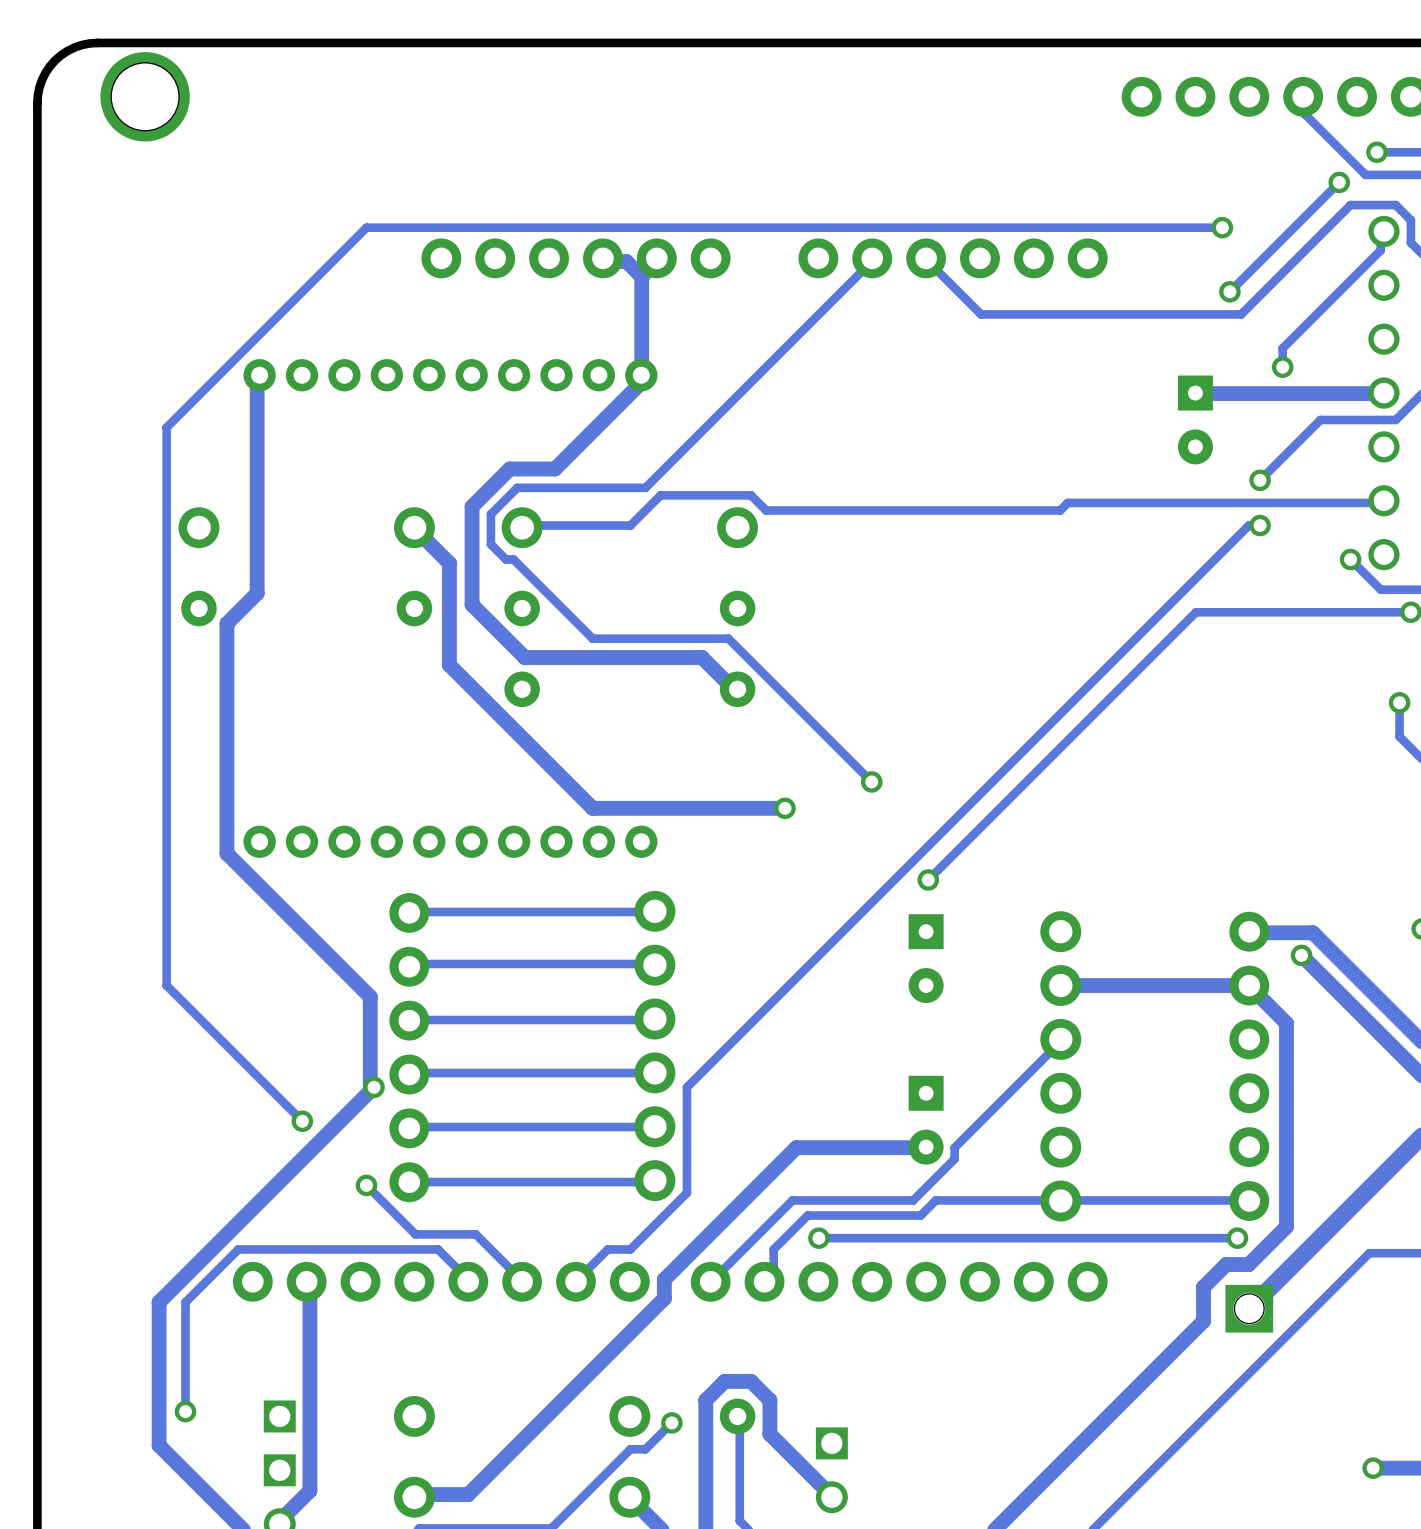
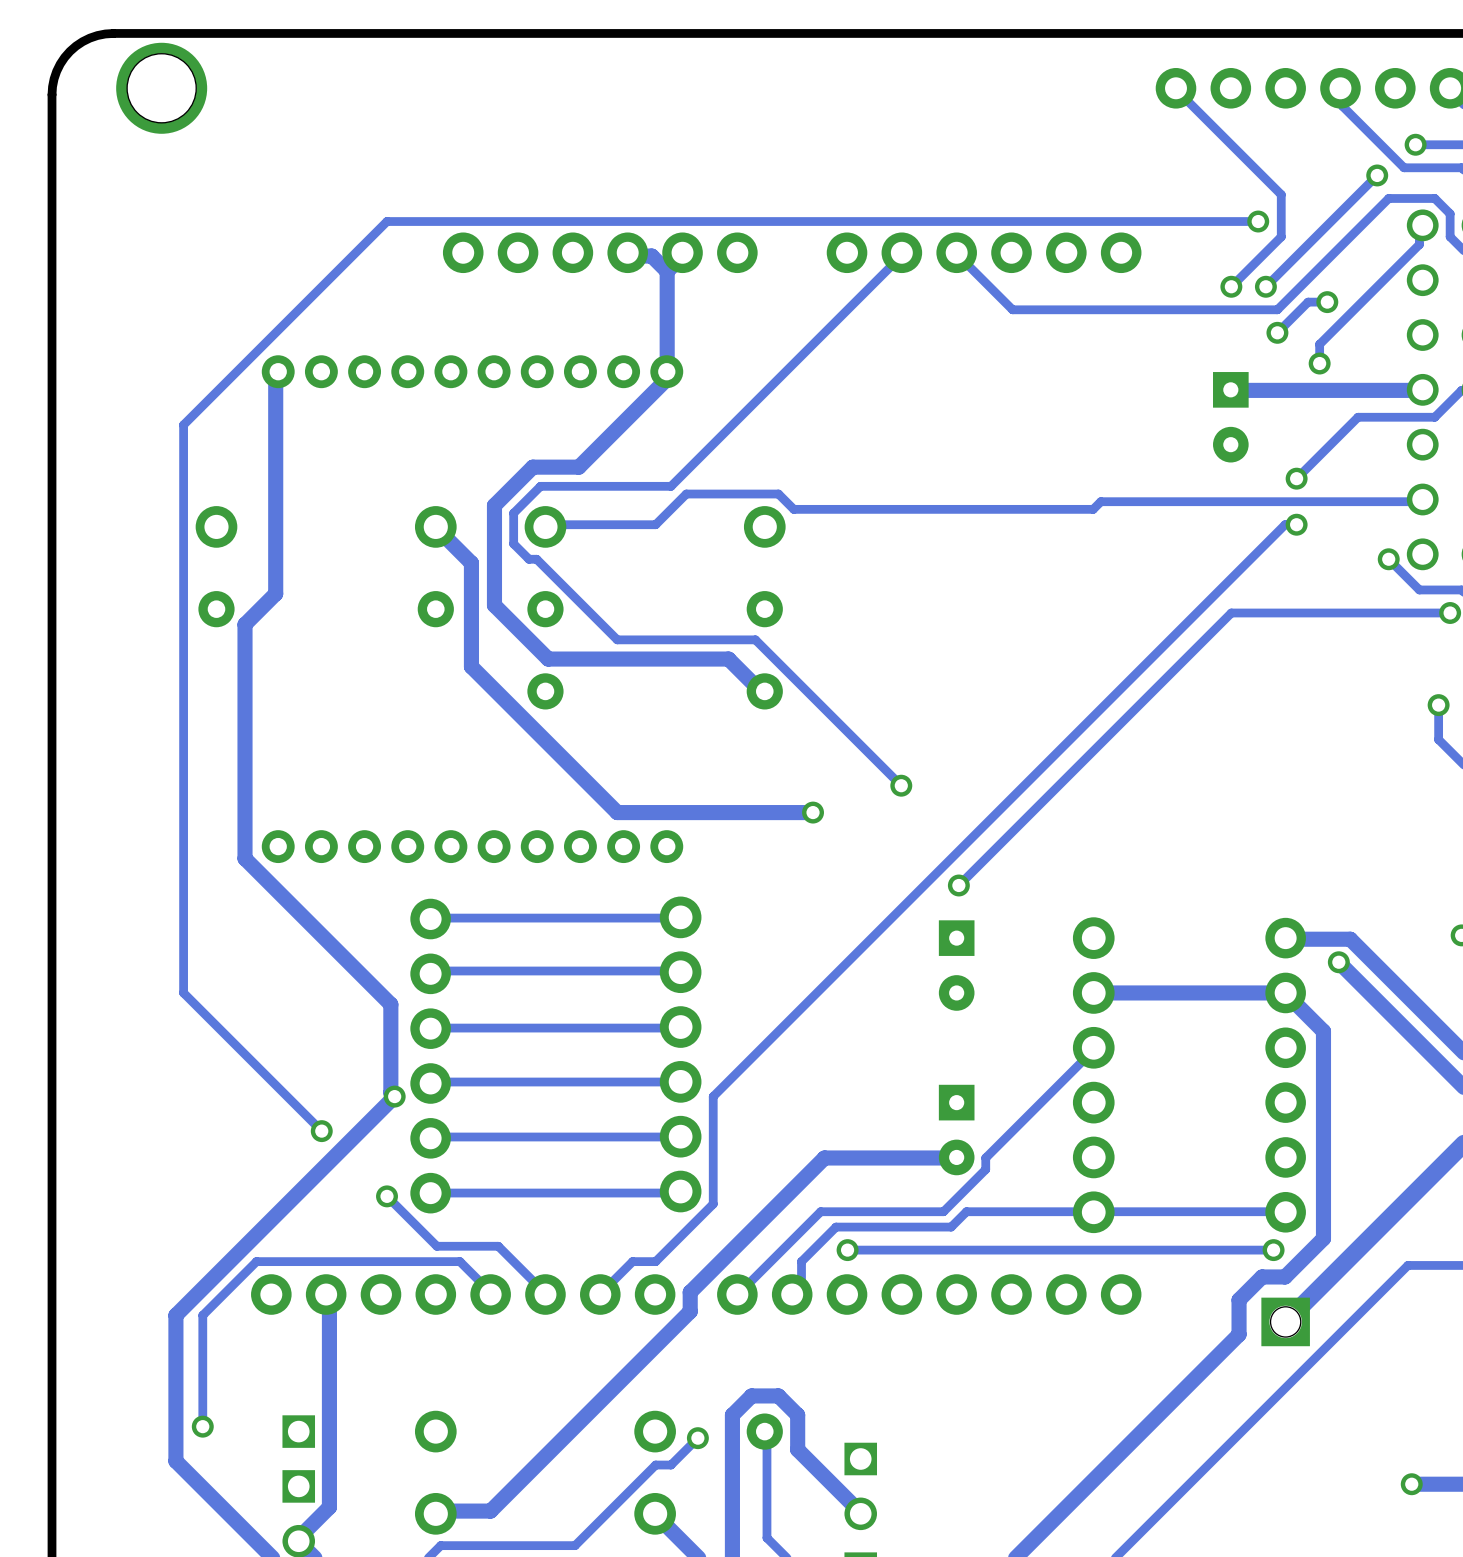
track: none -> (1175, 88) (1281, 194) (1281, 236) (1231, 286)
via: none -> (1231, 286)
track: none -> (1327, 302) (1308, 302) (1277, 332)
via: none -> (1327, 302)
via: none -> (1277, 332)

